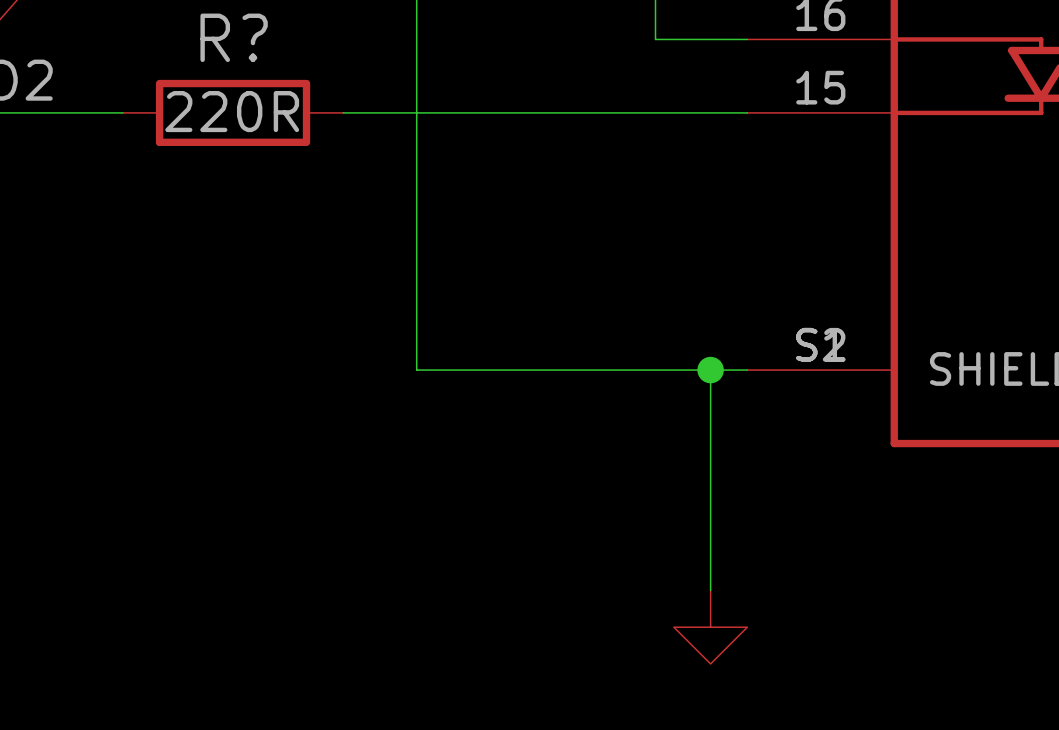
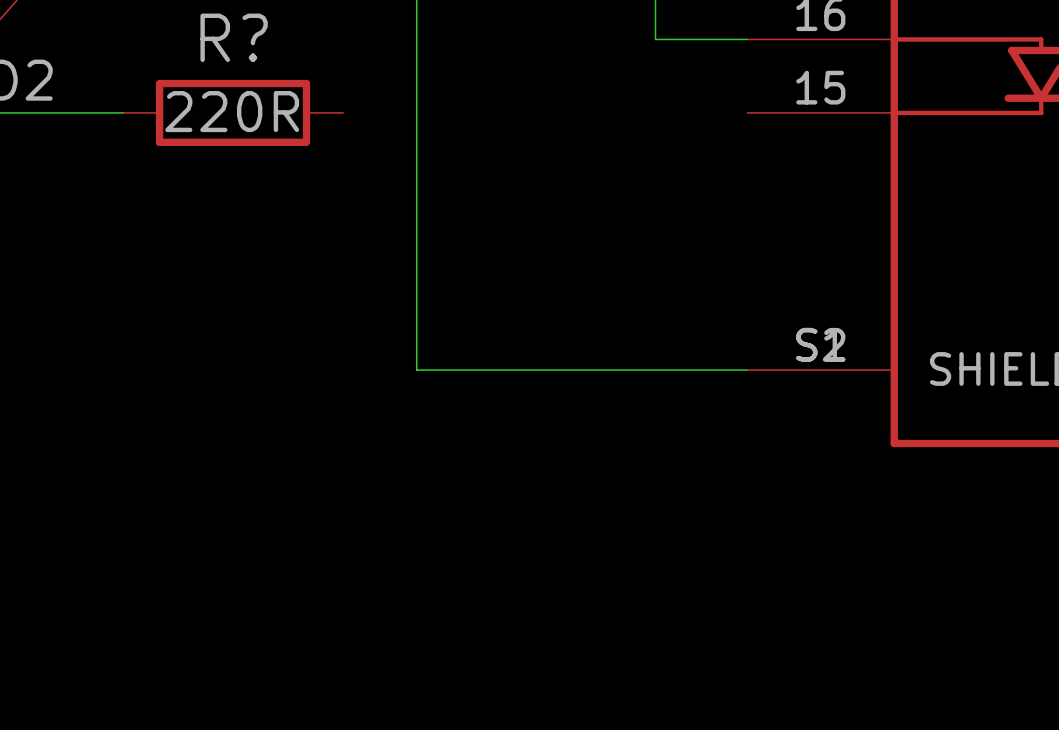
wire: (343, 112) (747, 112) -> none
wire: (710, 370) (710, 590) -> none
junction: (710, 370) -> none
power symbol: (710, 627) -> none

